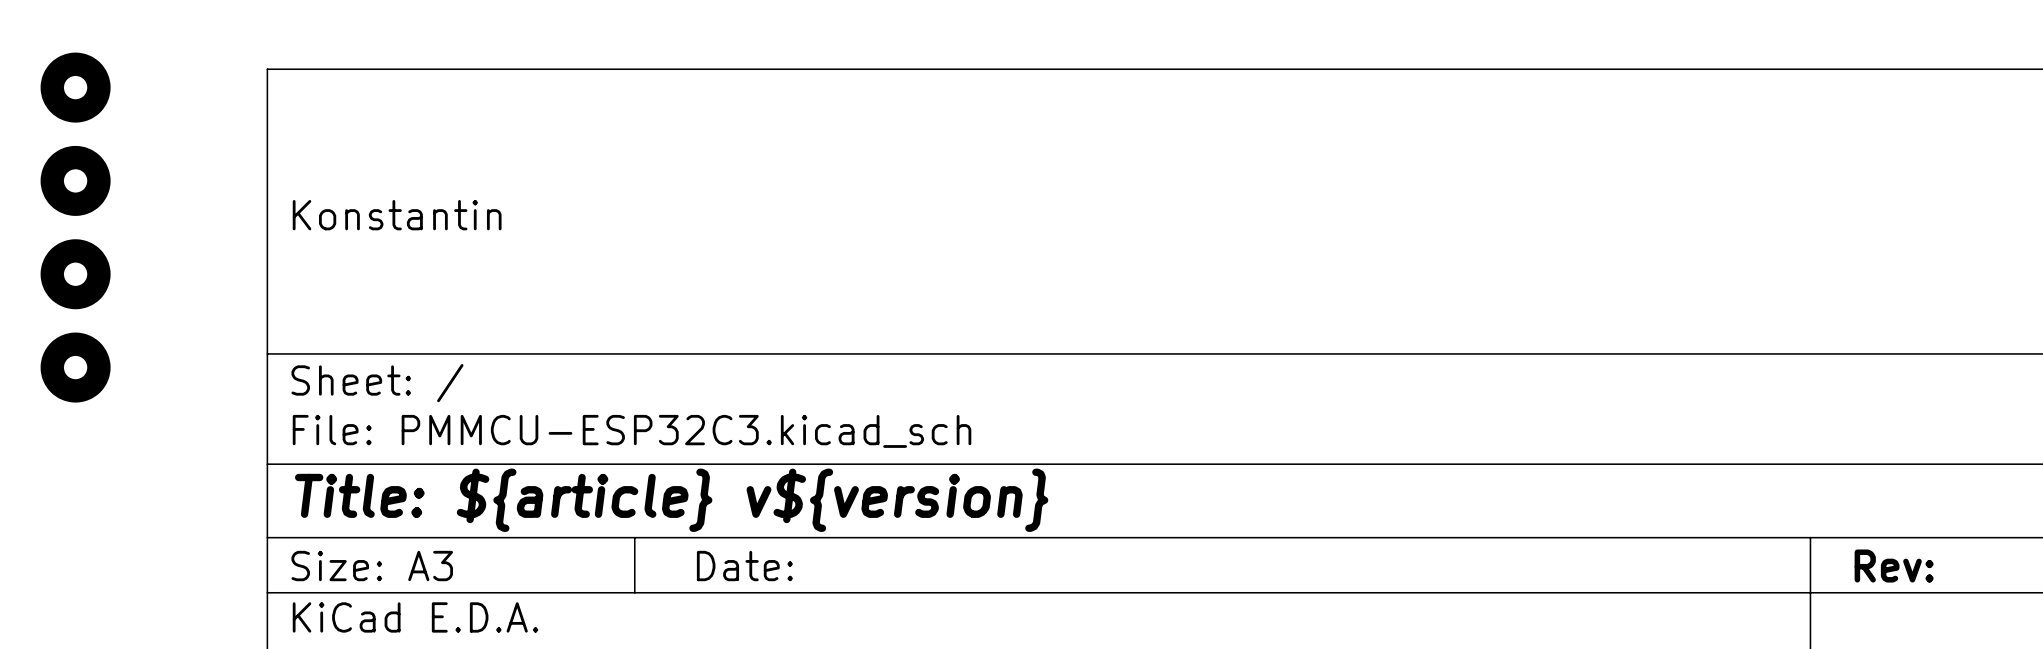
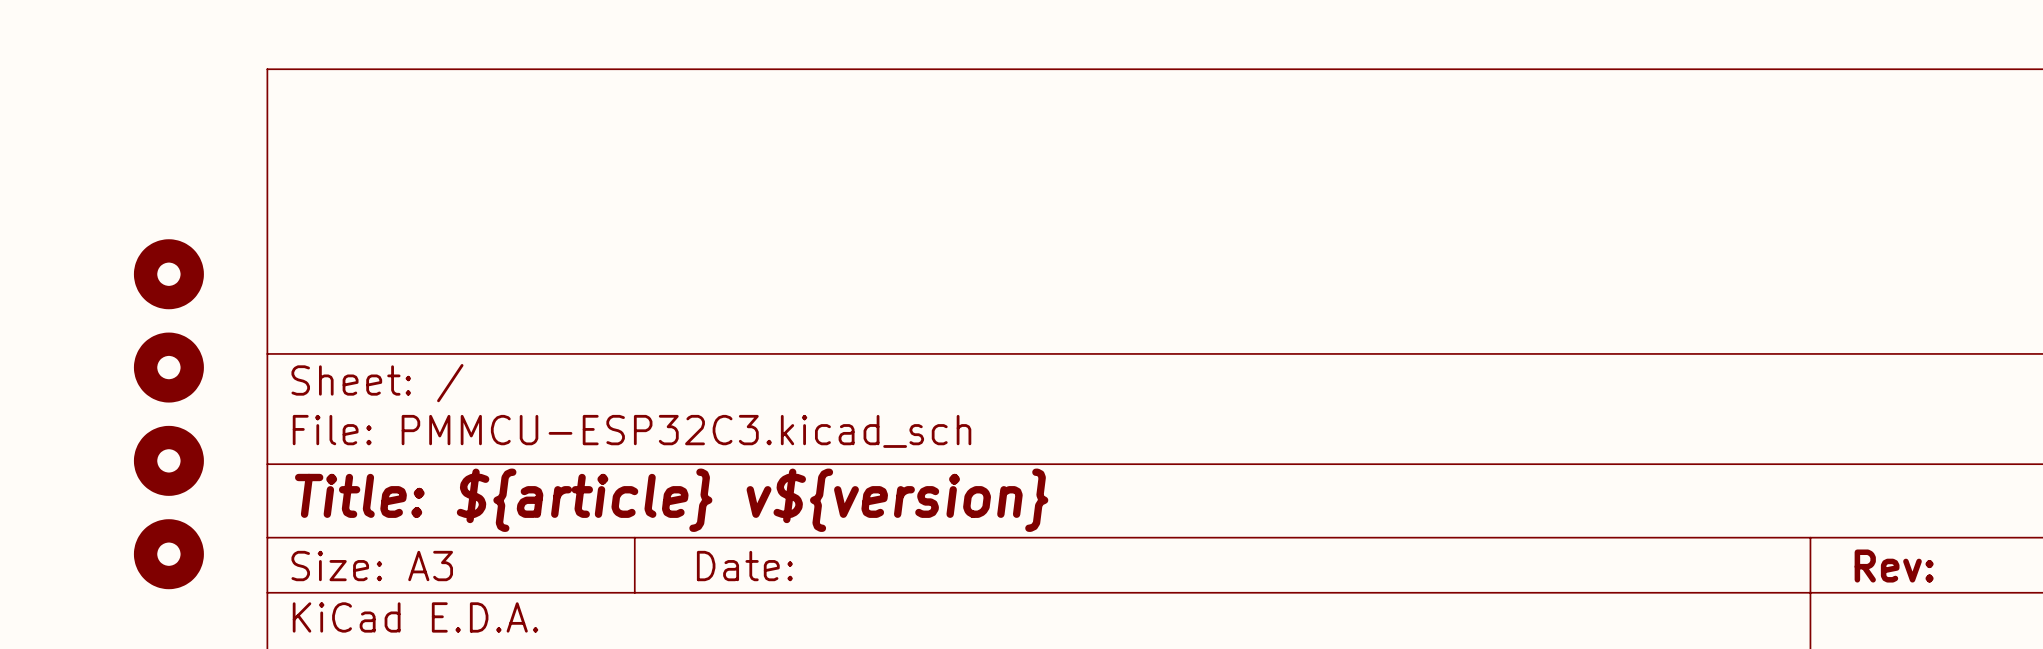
part: (75, 87) -> none
part: (75, 180) -> none
title block: Konstantin (397, 215) -> none
part: (75, 274) -> none
part: none -> (168, 274)
part: (75, 367) -> none
part: none -> (168, 367)
part: none -> (168, 460)
part: none -> (168, 554)

